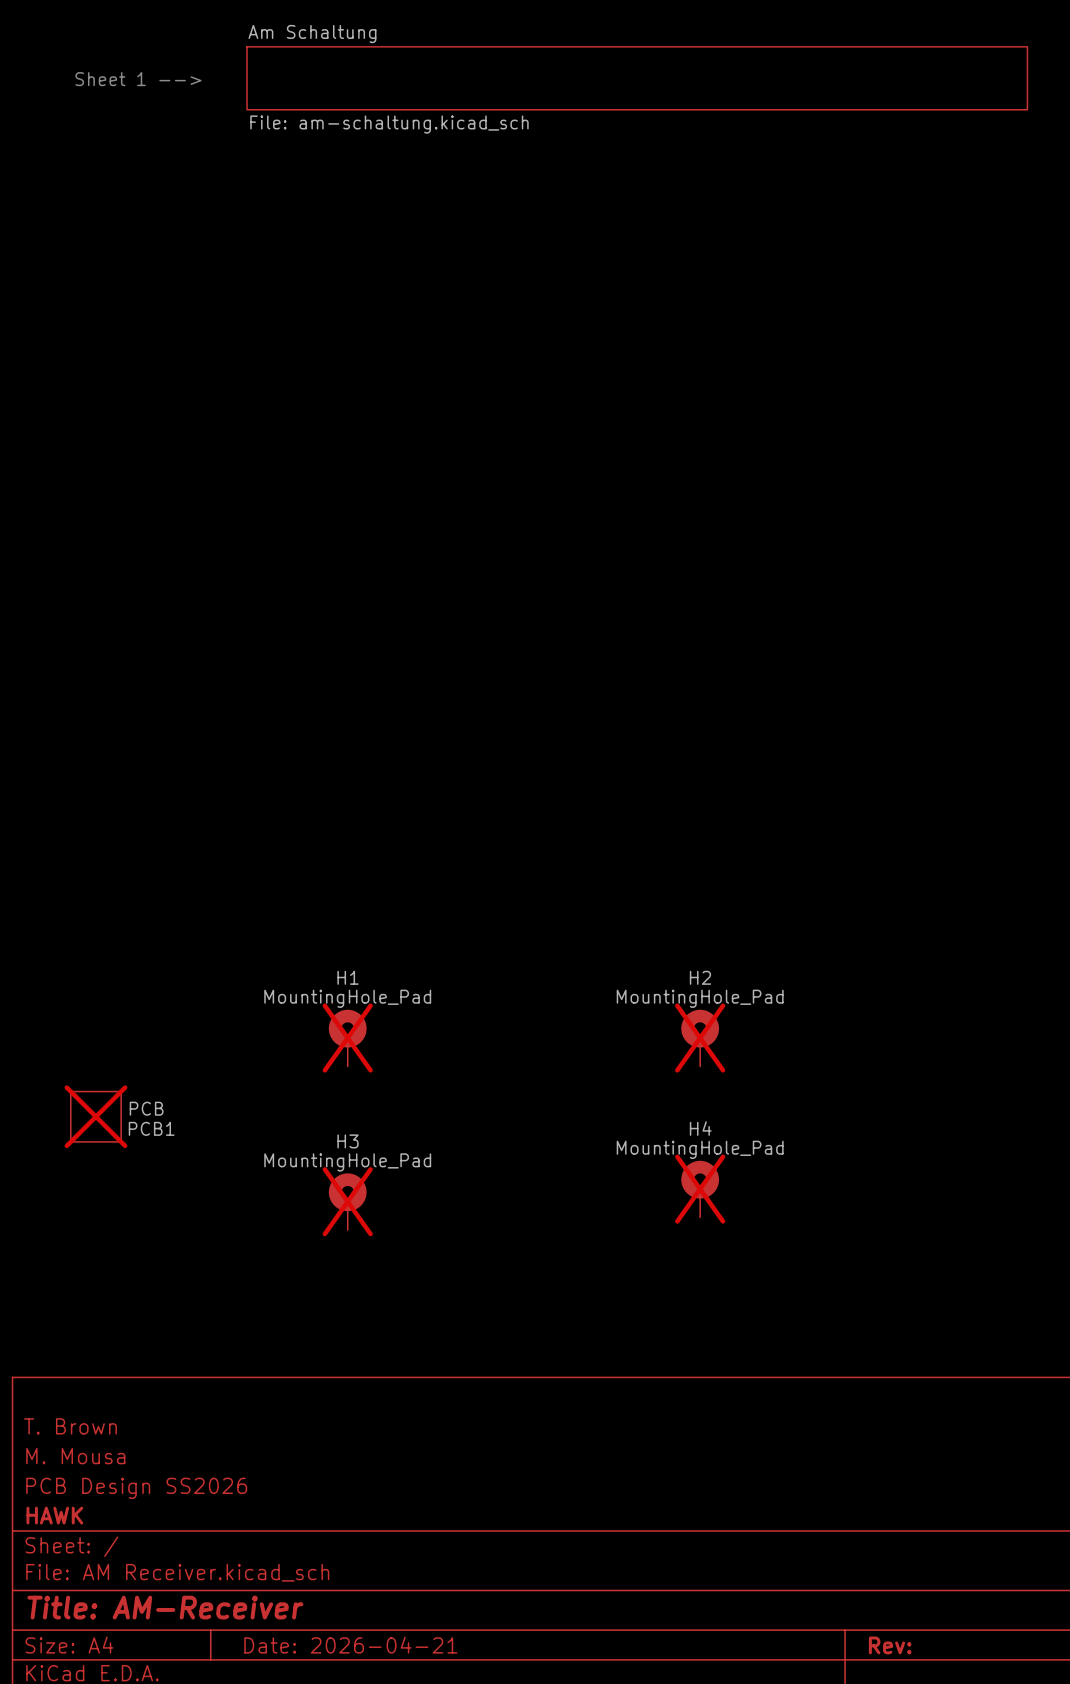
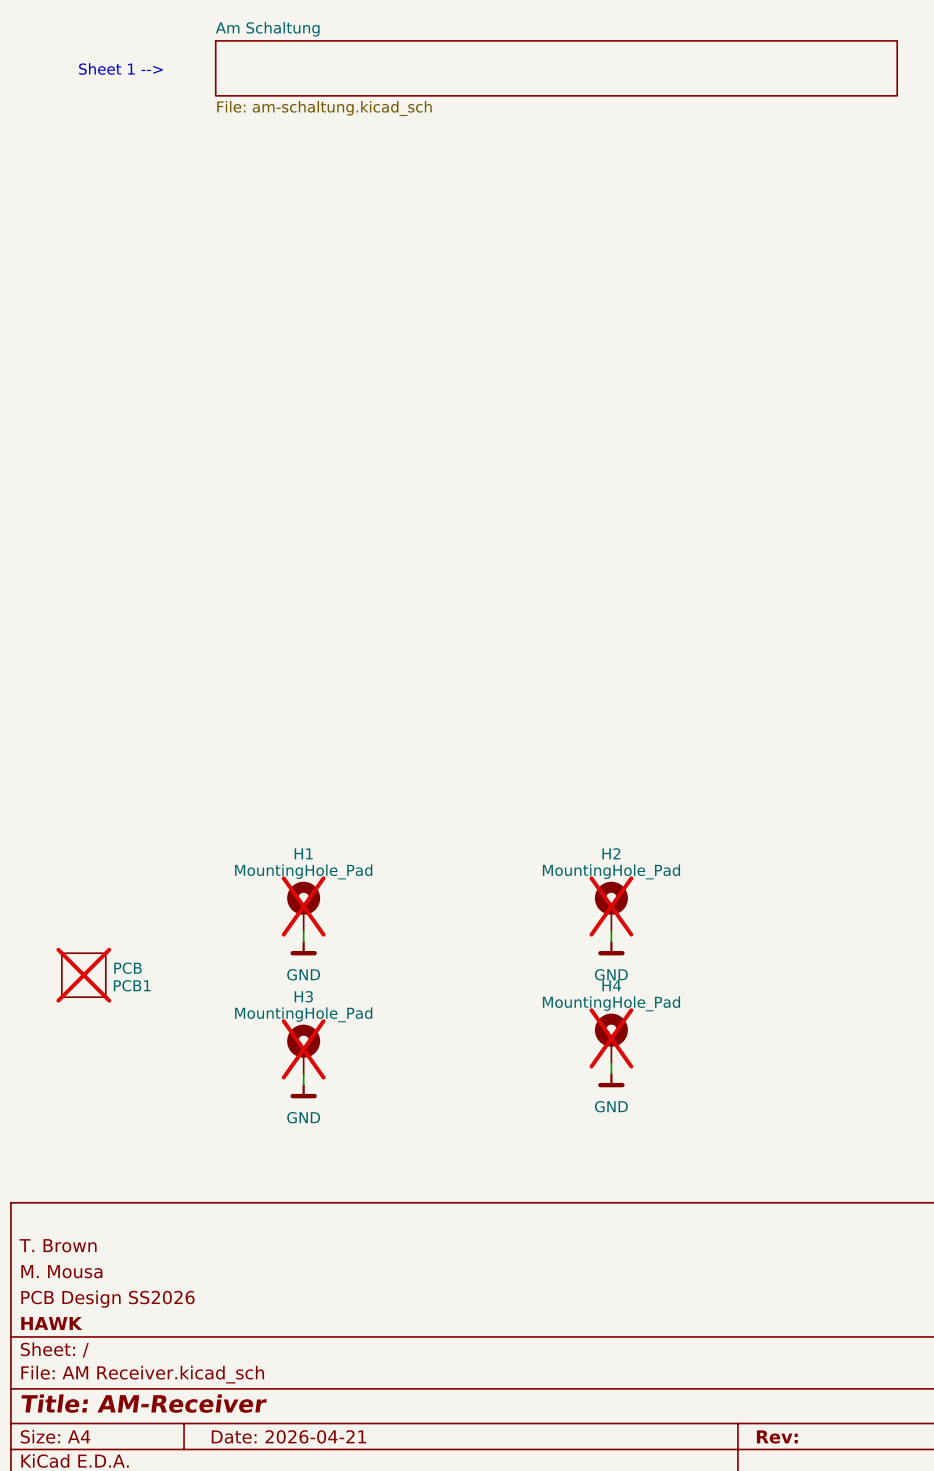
wire: none -> (303, 931) (303, 942)
wire: none -> (611, 931) (611, 942)
power symbol: none -> GND (303, 948)
power symbol: none -> GND (611, 948)
wire: none -> (611, 1063) (611, 1074)
wire: none -> (303, 1074) (303, 1085)
power symbol: none -> GND (611, 1080)
power symbol: none -> GND (303, 1091)

